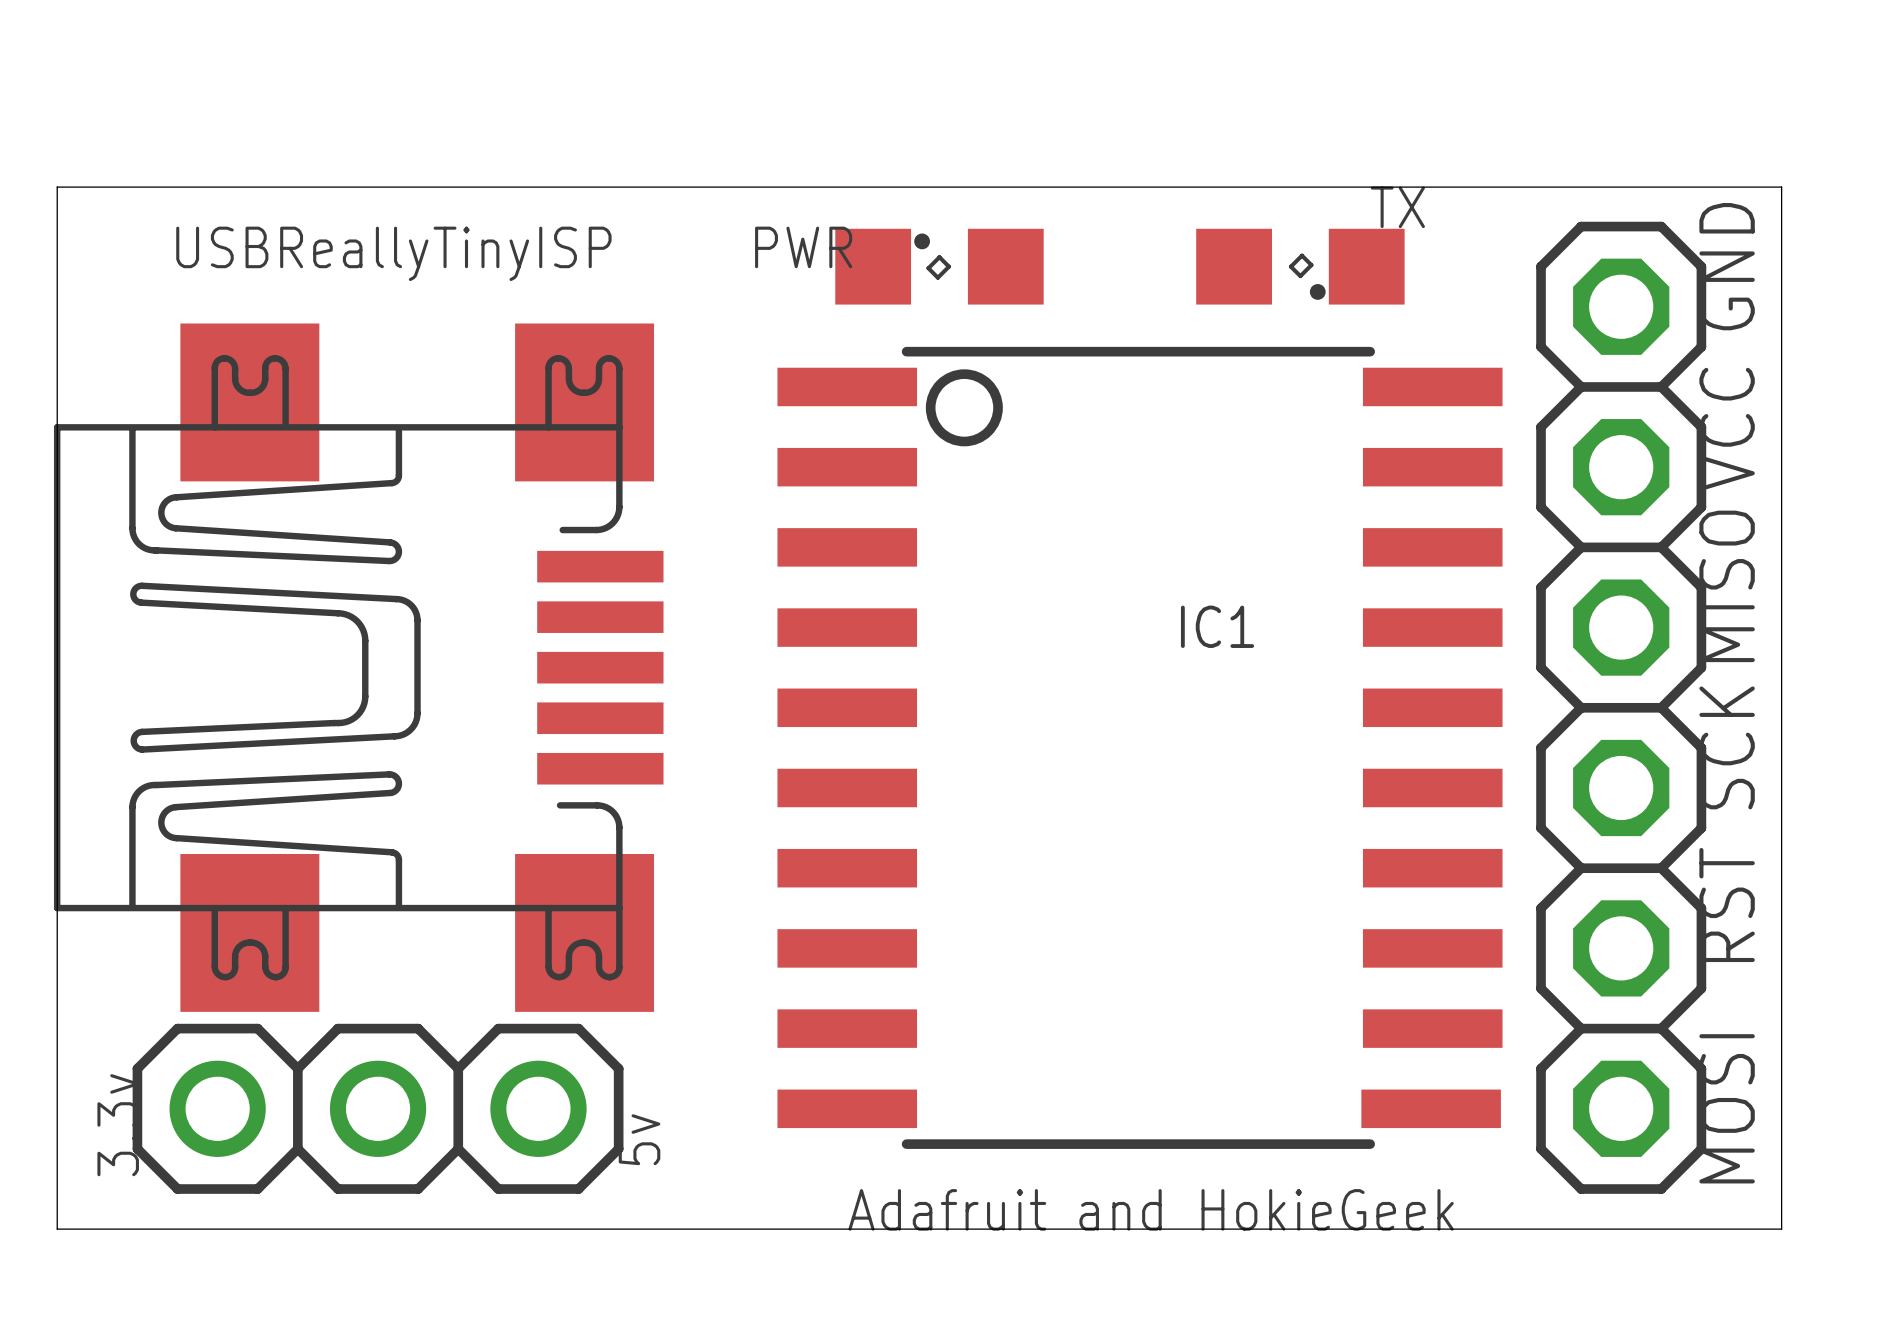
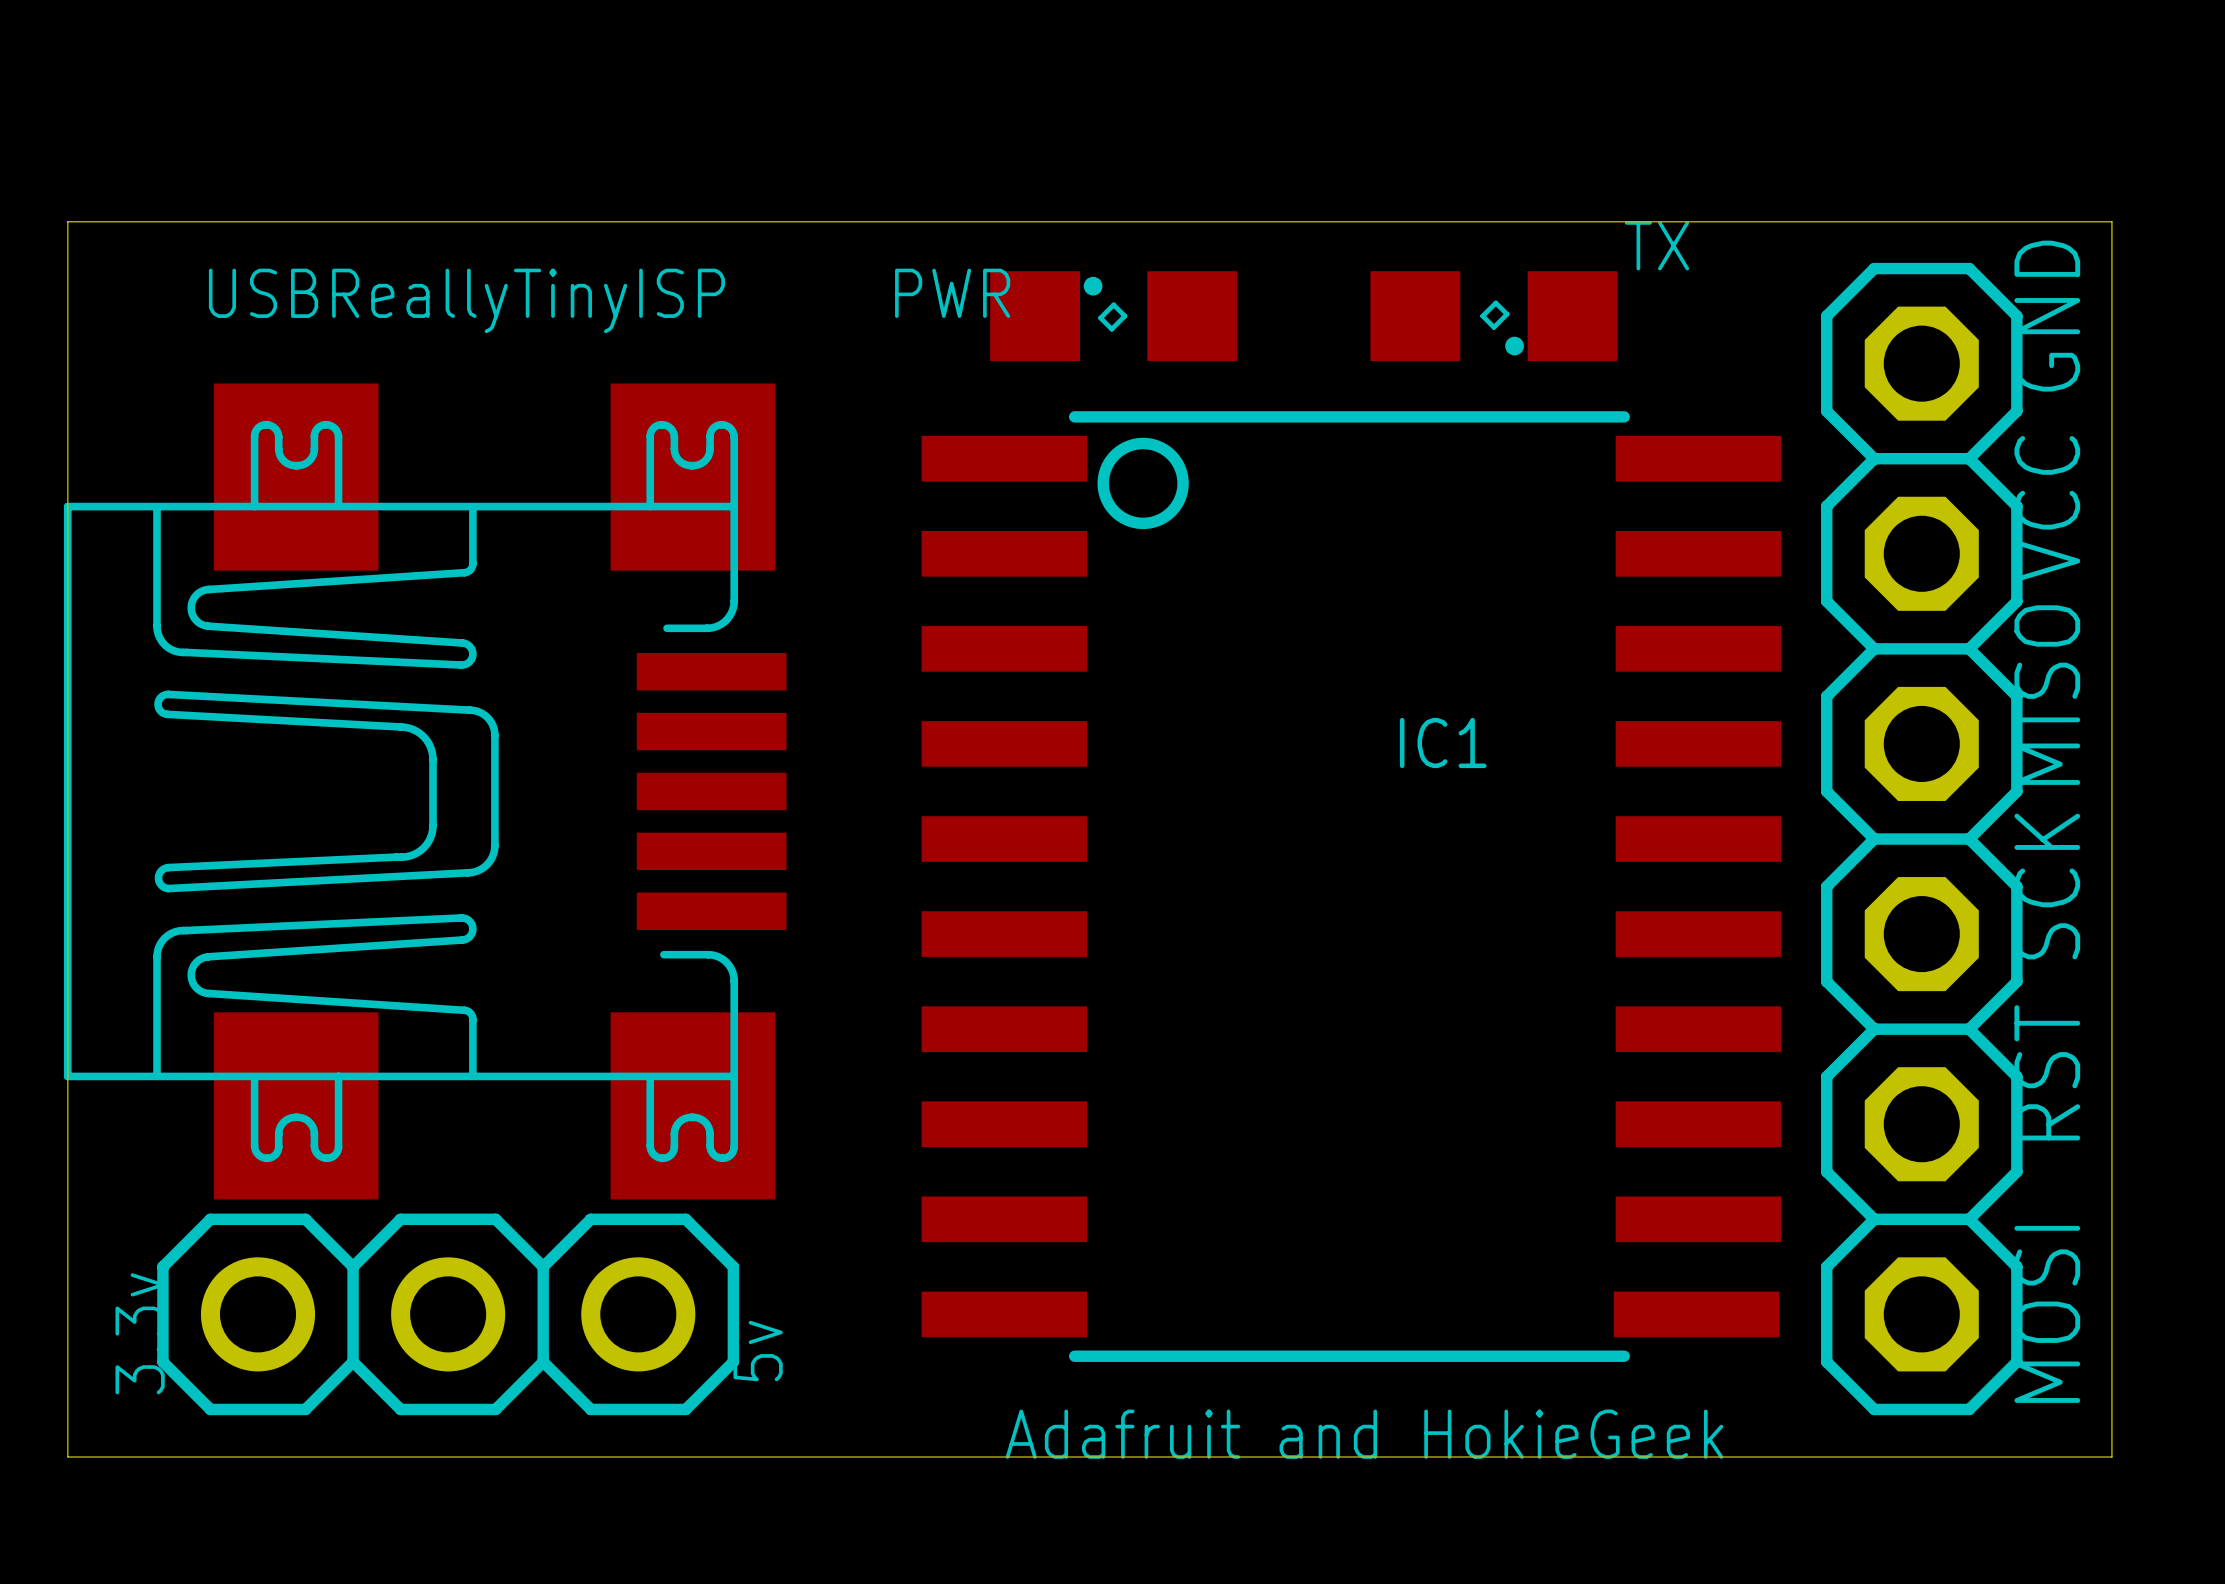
part position: (1300, 266) -> (1493, 316)

